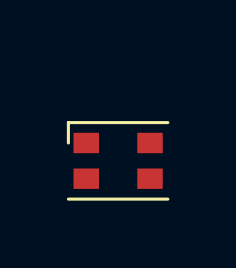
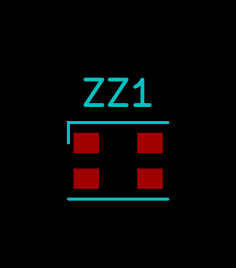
ZZ1 name: none -> ZZ1 (117, 92)

